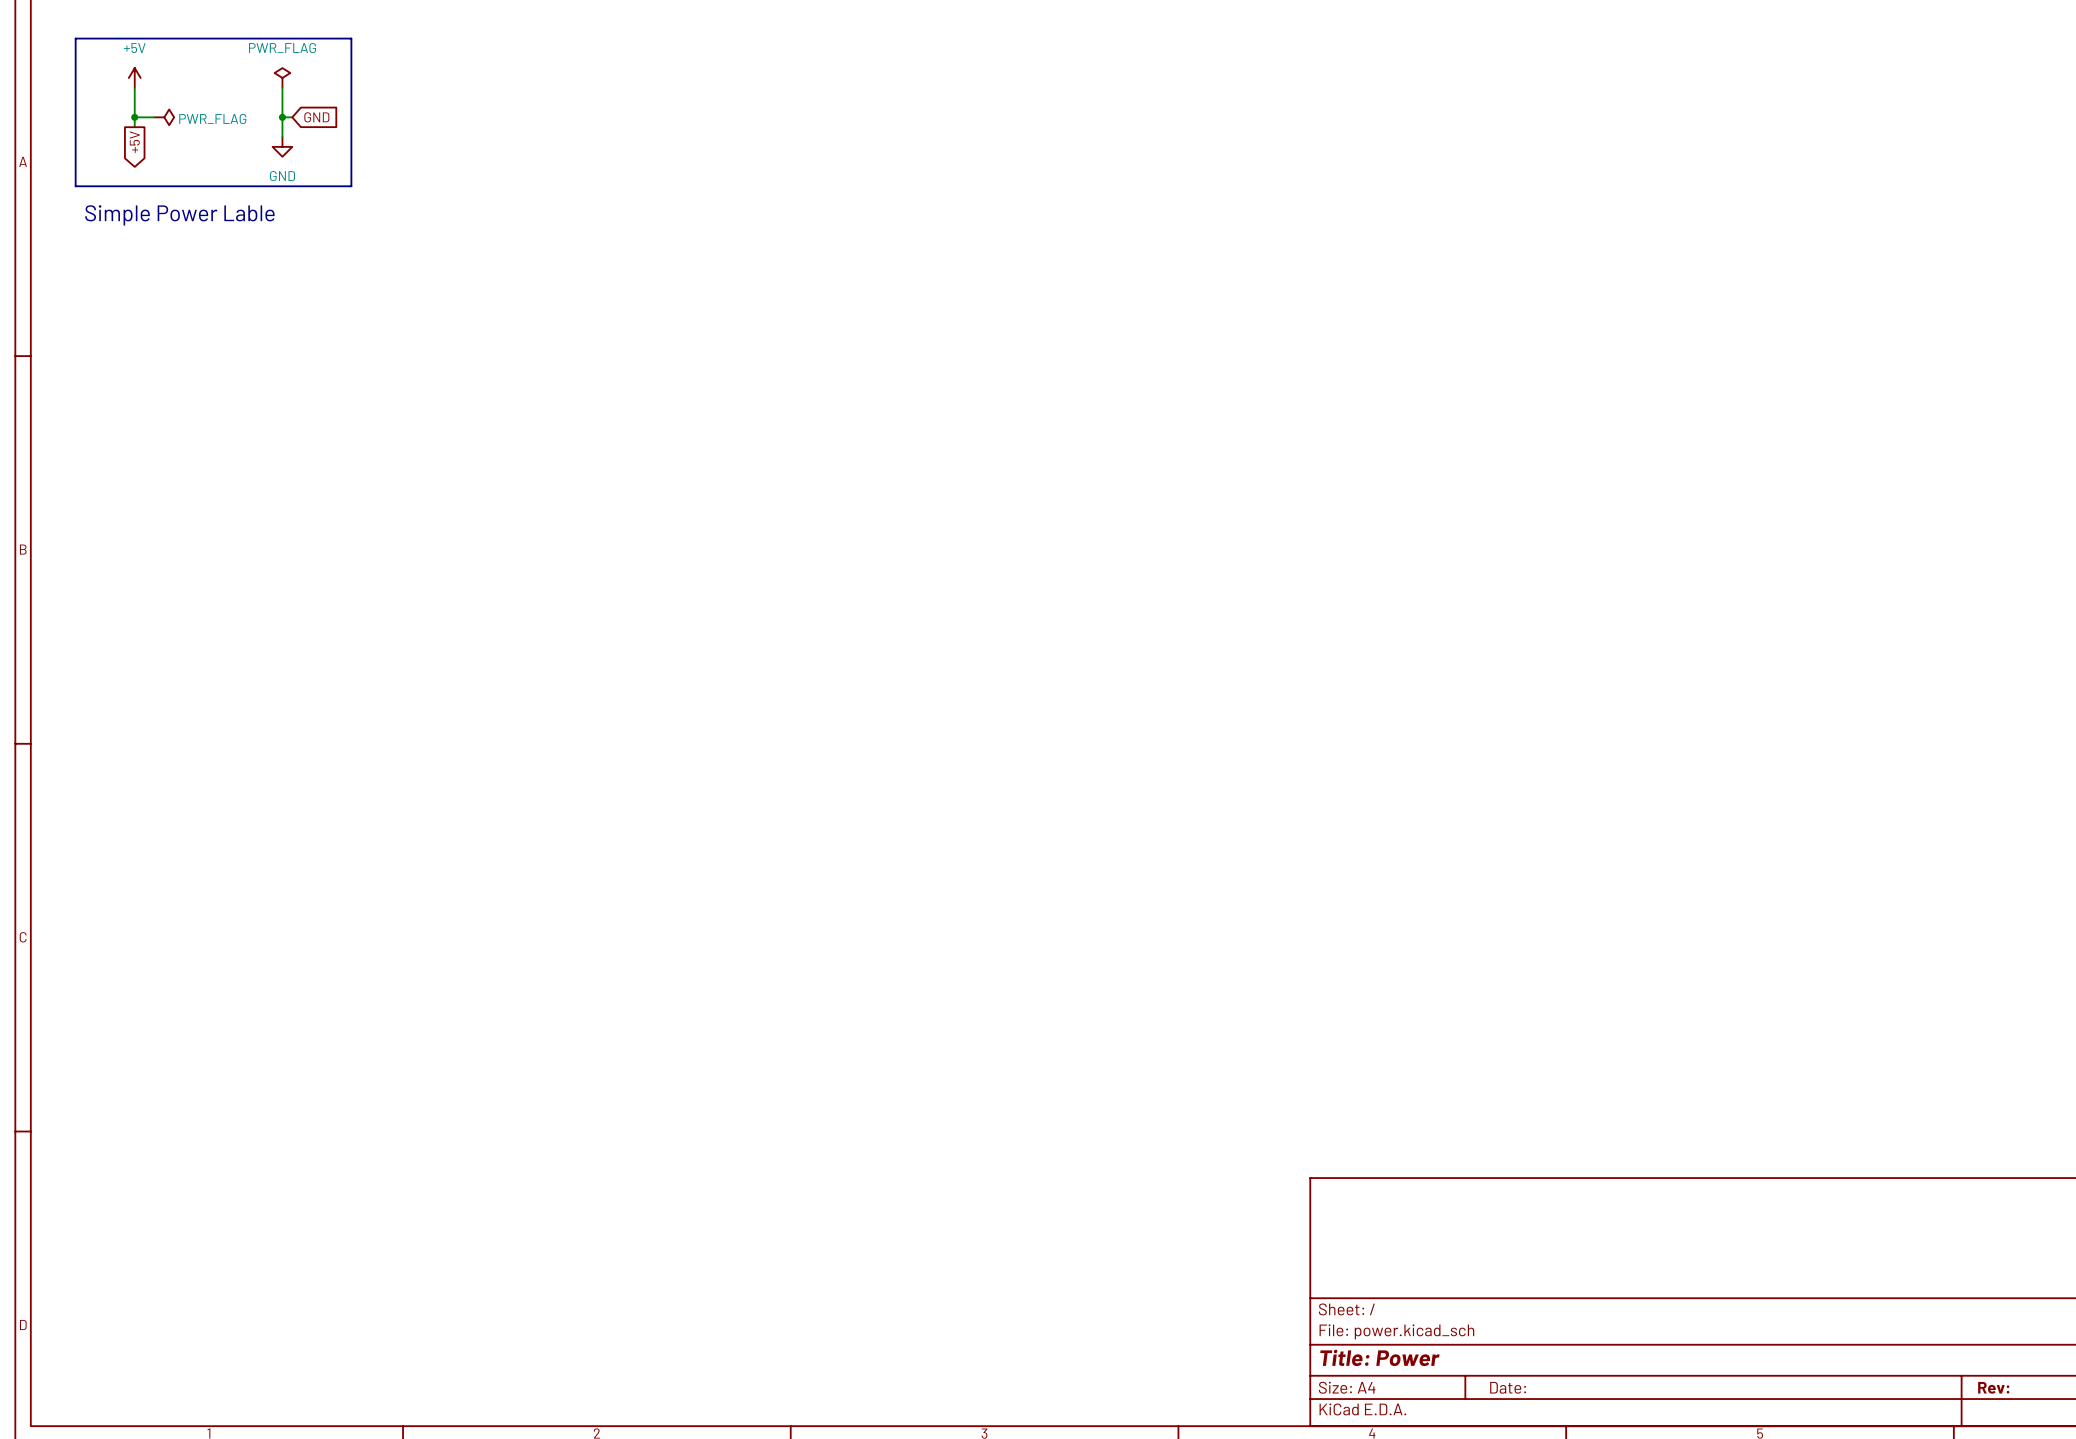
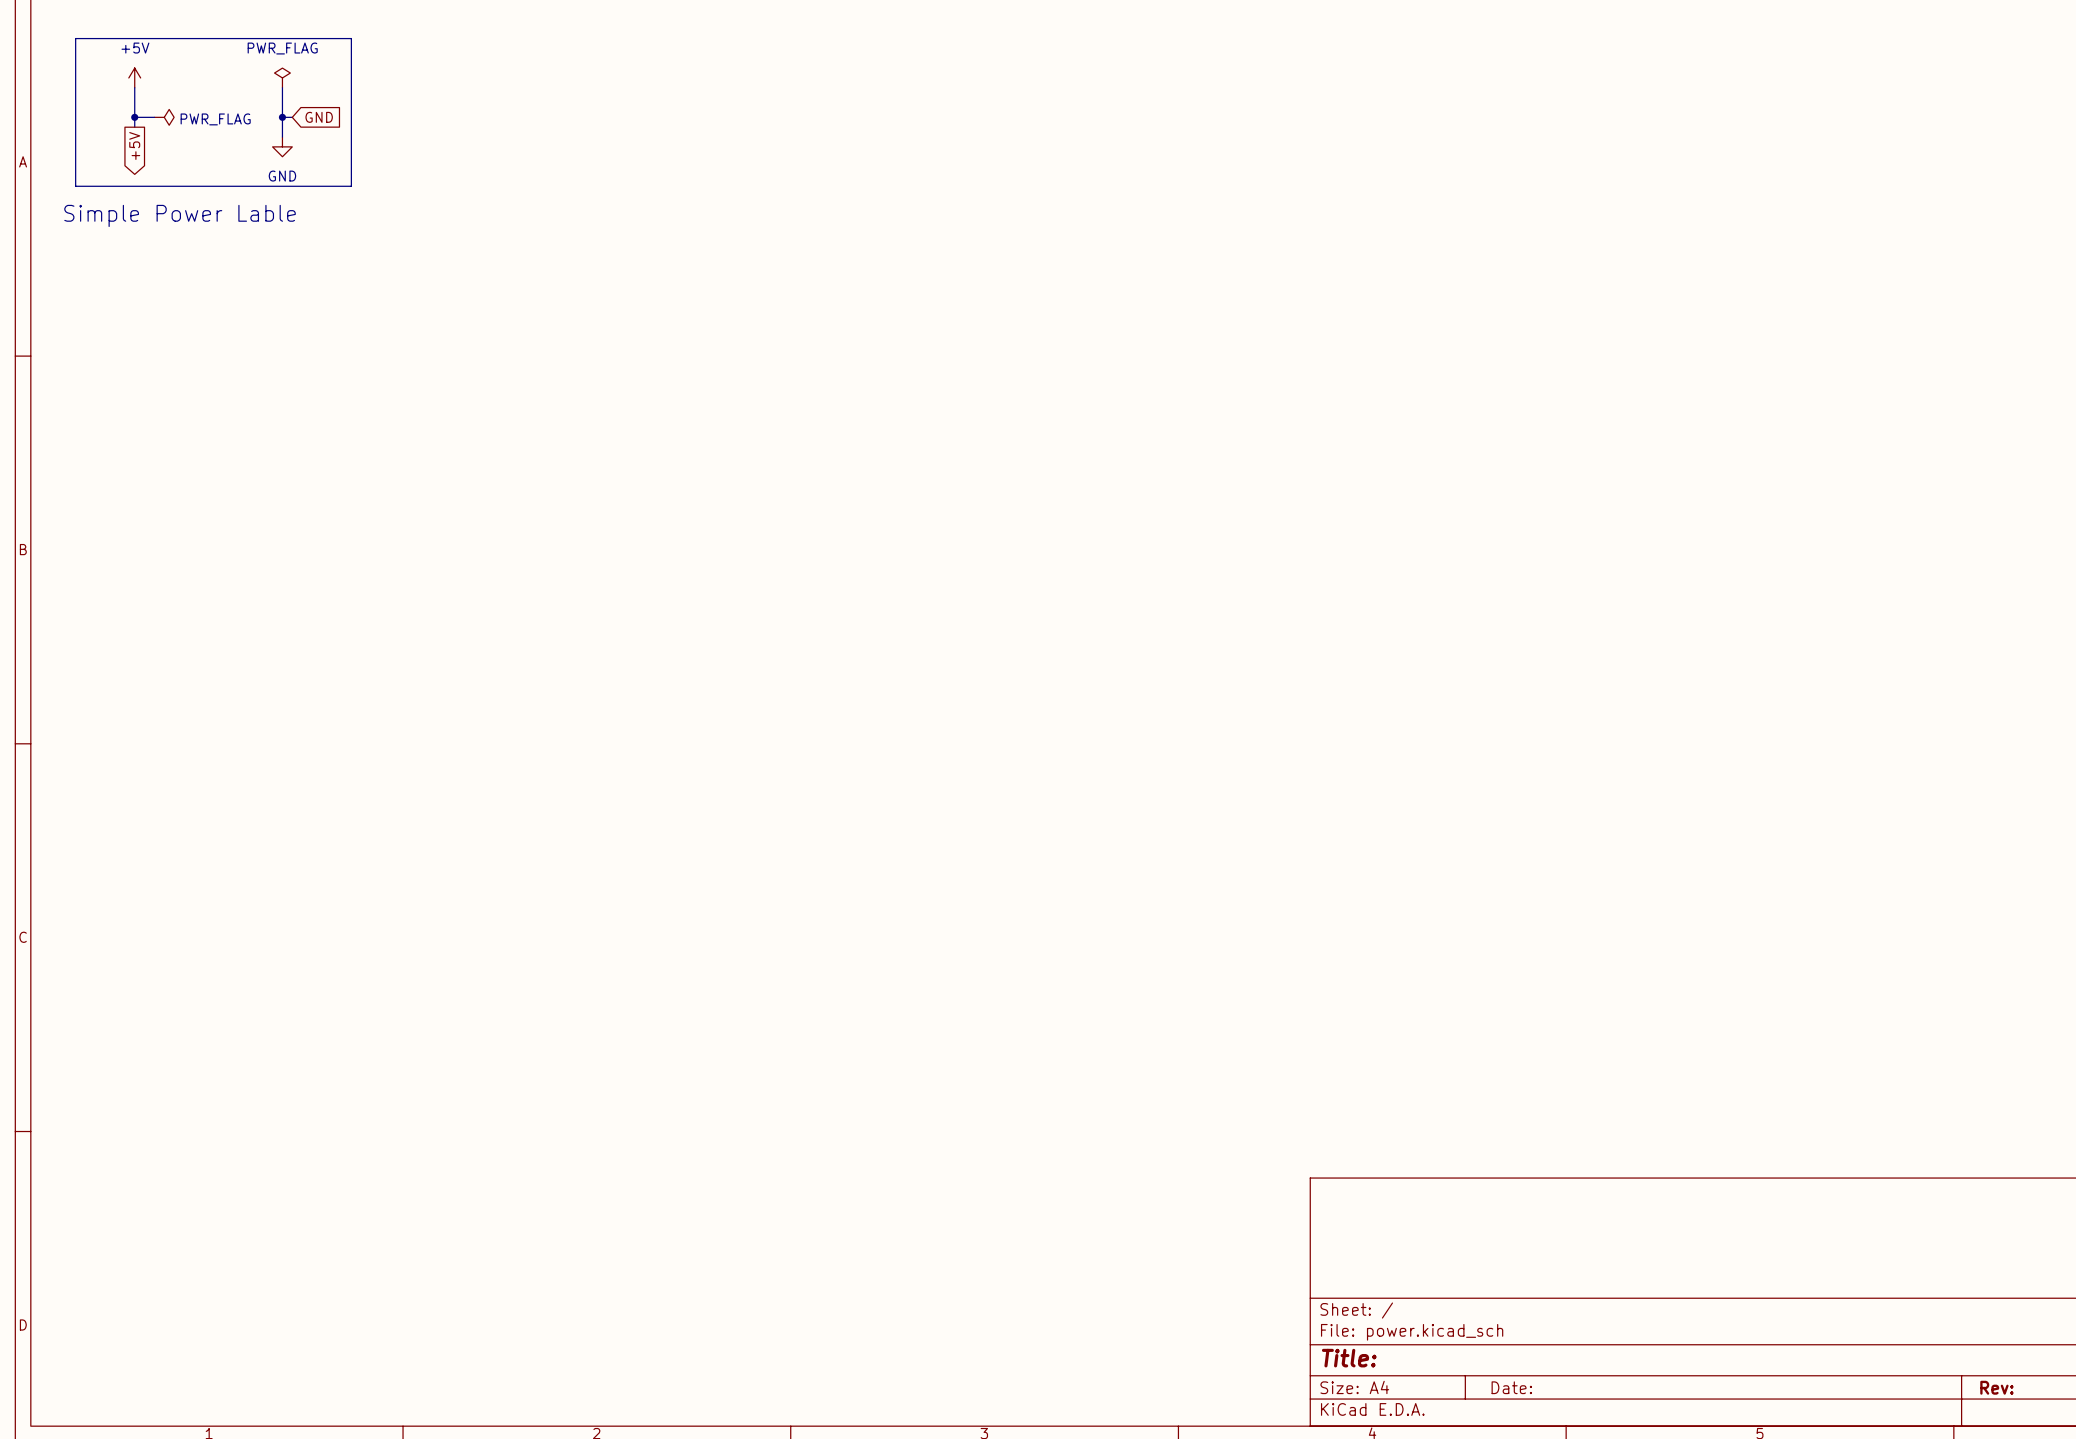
title block: Title: Power (1379, 1357) -> Title: (1349, 1358)

